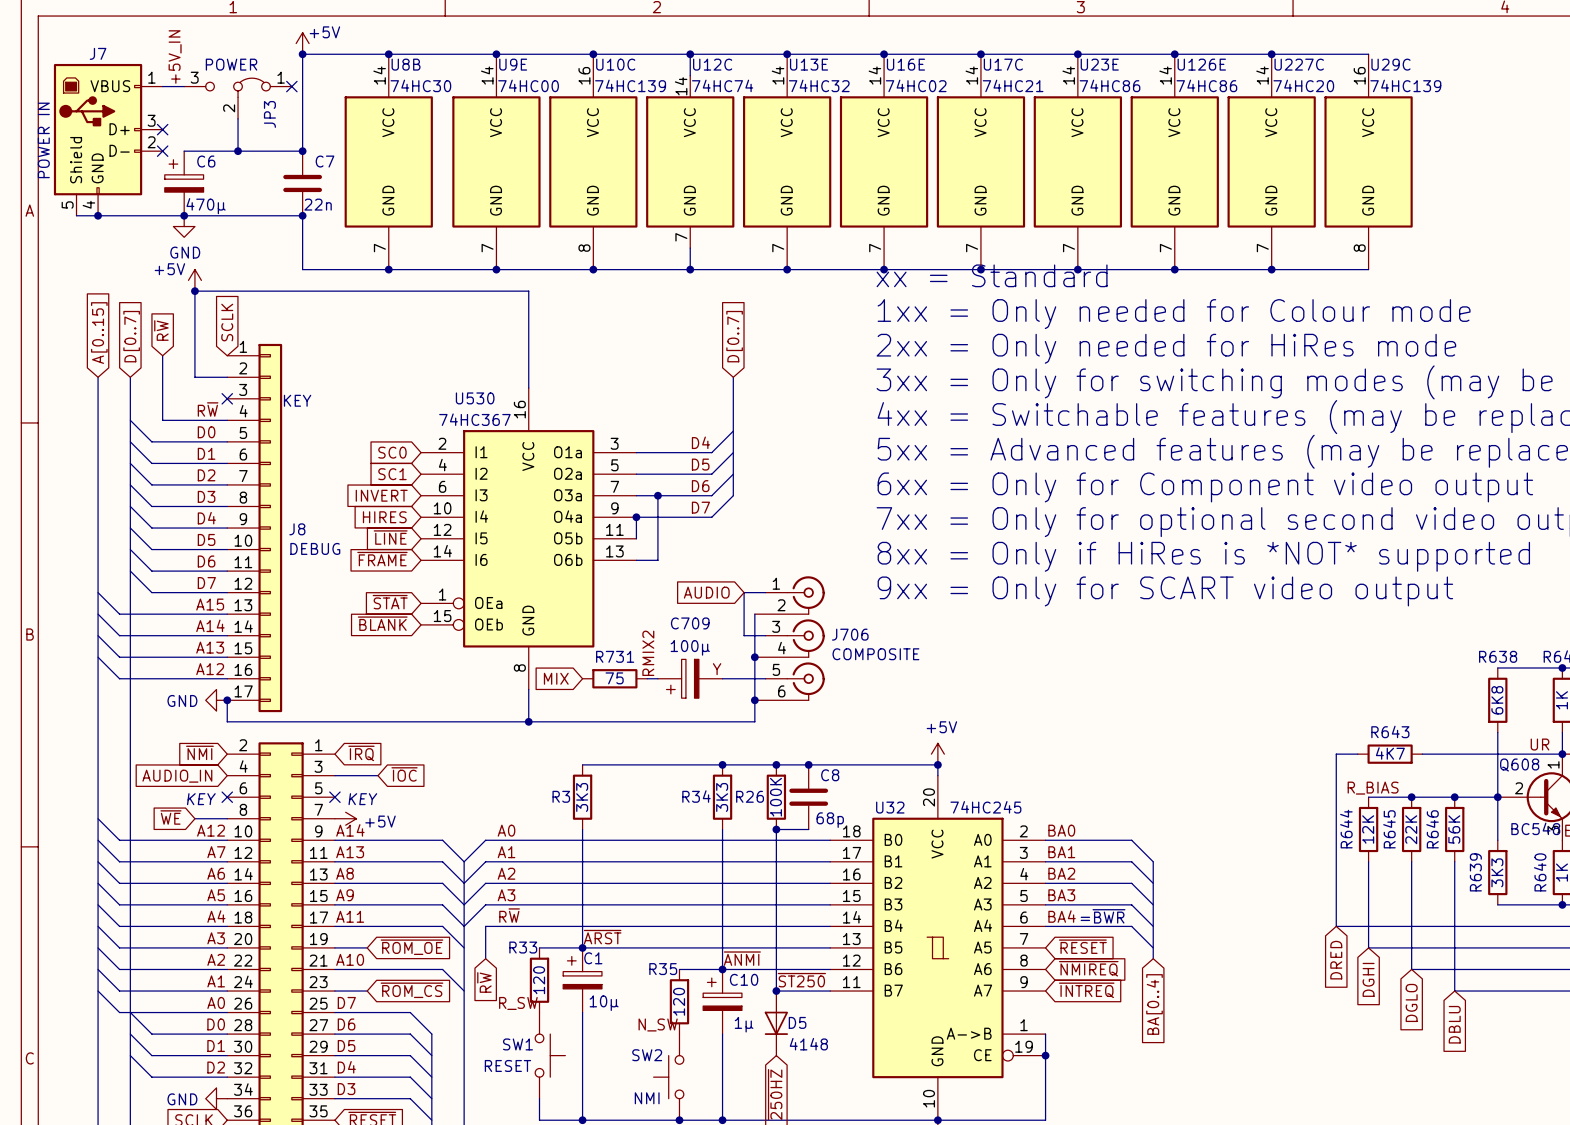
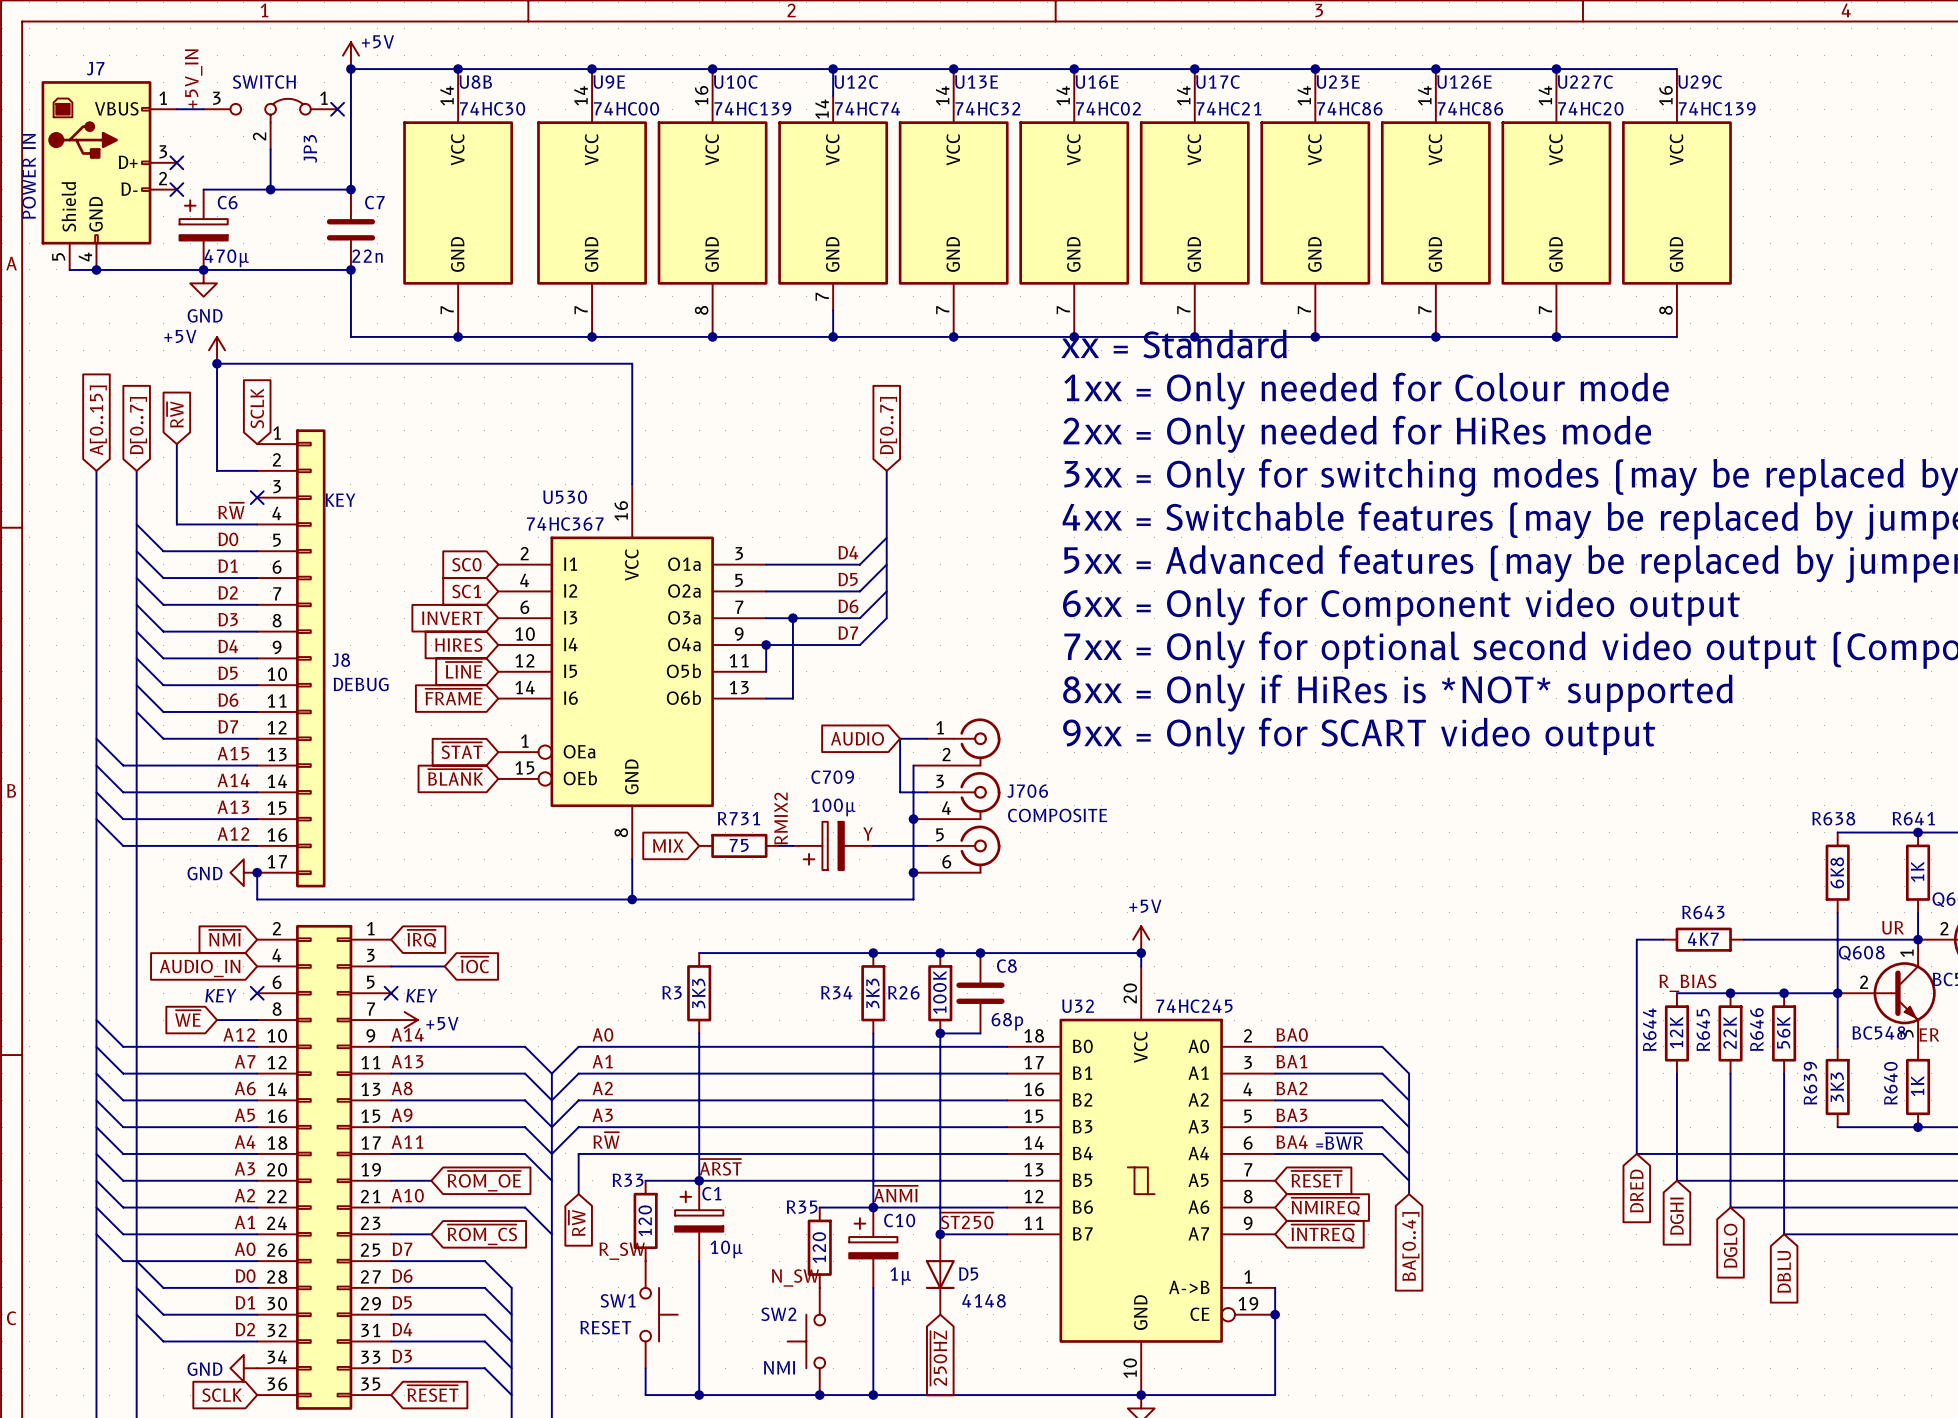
JP3 value: POWER (231, 64) -> SWITCH (264, 82)

